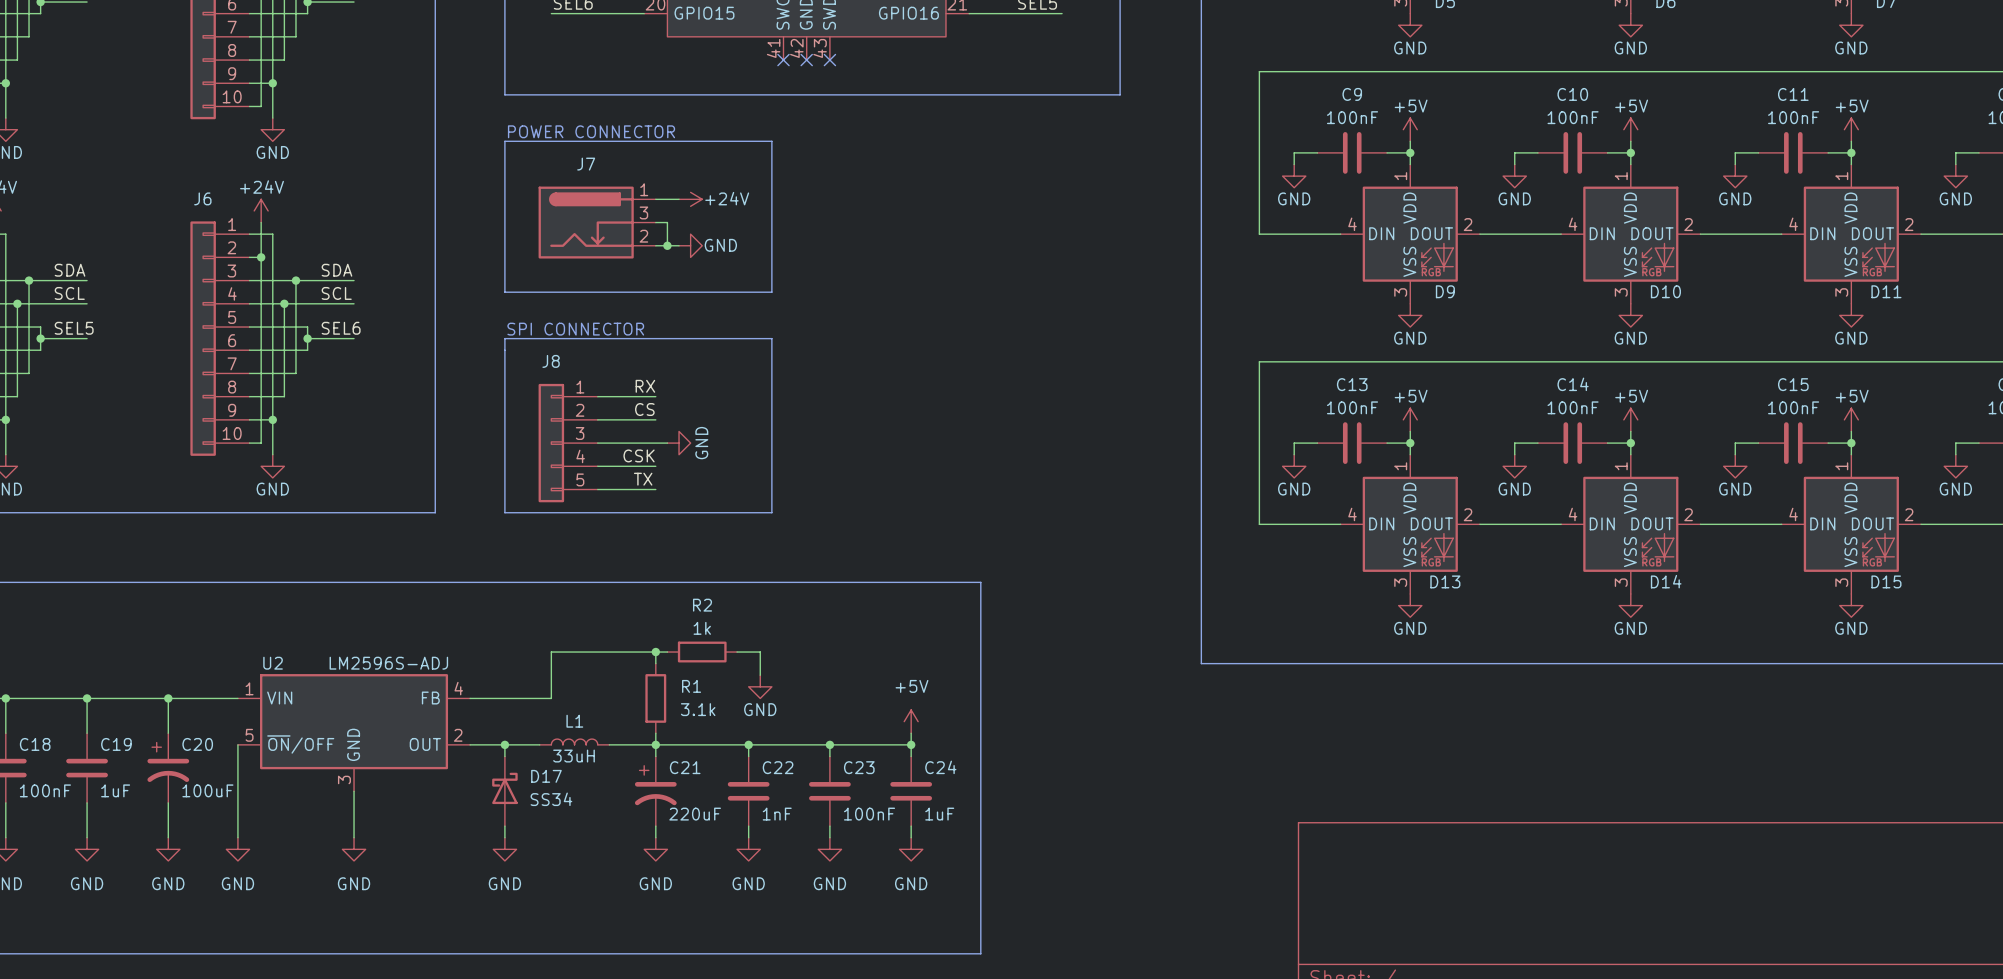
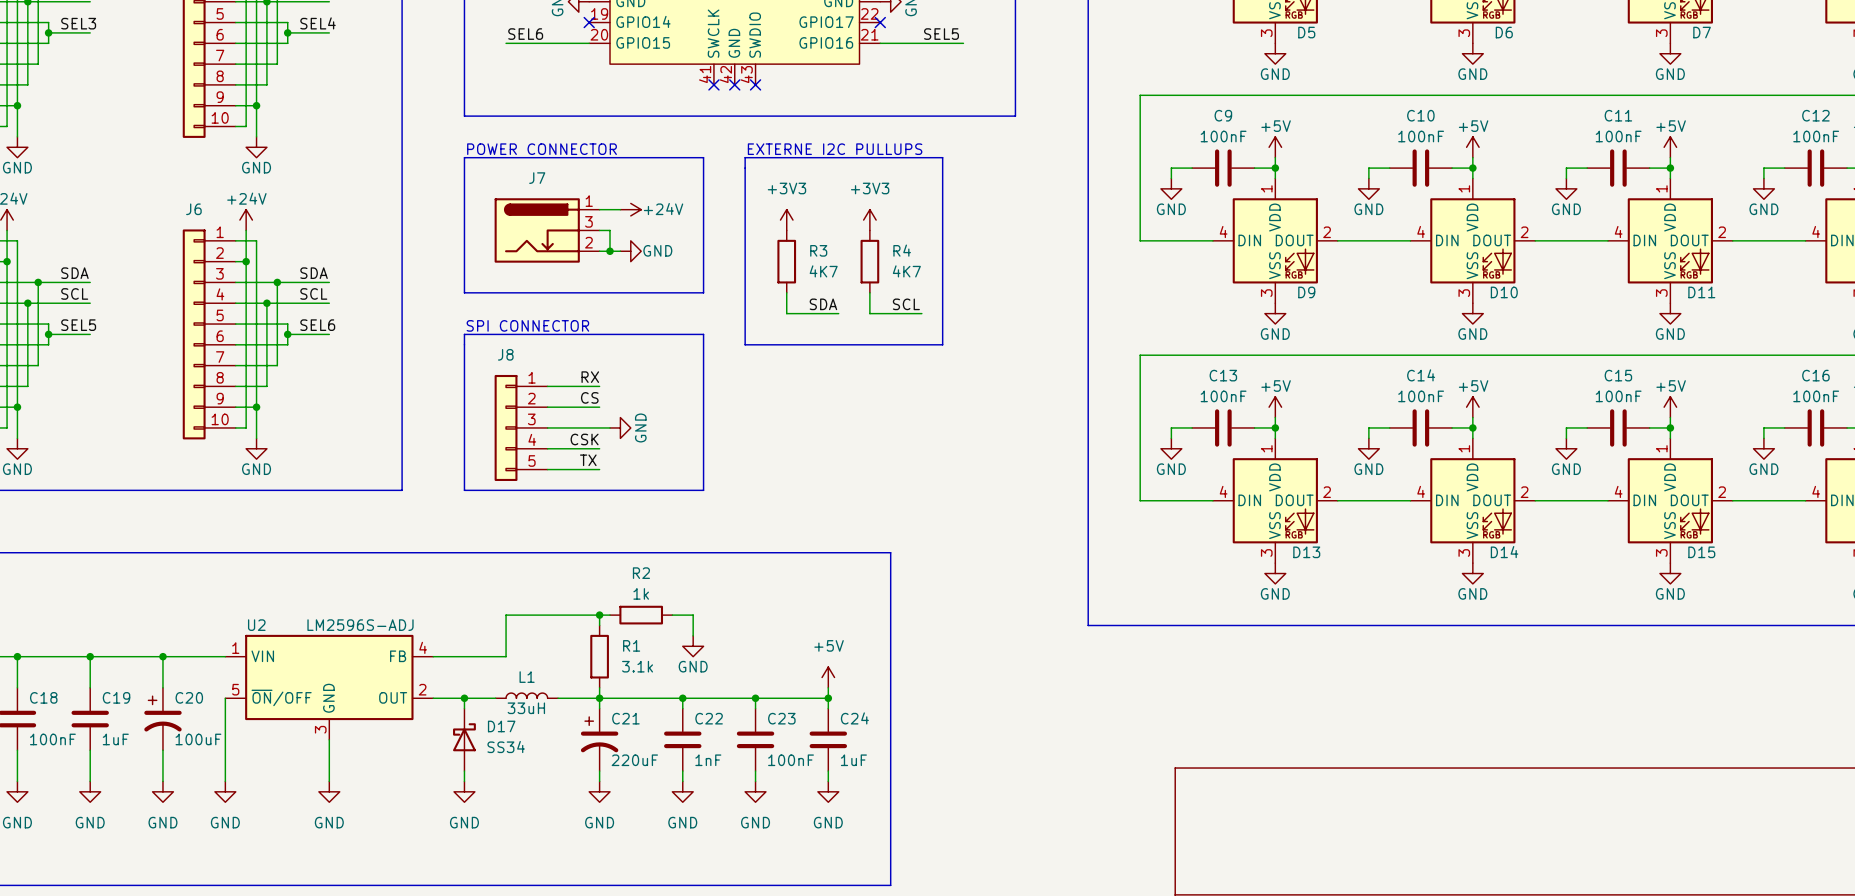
text: none -> EXTERNE I2C PULLUPS (835, 149)
line: none -> (745, 157) (745, 344) (942, 344) (942, 157) (745, 157)
power symbol: none -> +3V3 (786, 220)
power symbol: none -> +3V3 (869, 220)
R3: none -> 4K7 (786, 261)
R4: none -> 4K7 (869, 261)
wire: none -> (786, 292) (786, 313) (838, 313)
wire: none -> (869, 292) (869, 313) (921, 313)
label: none -> SDA (823, 304)
label: none -> SCL (906, 304)

